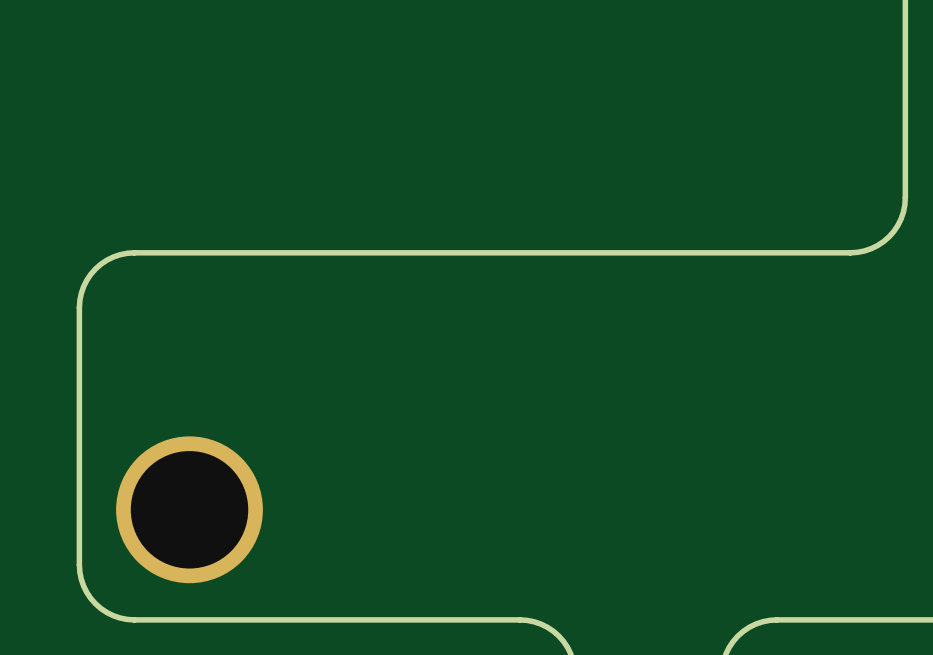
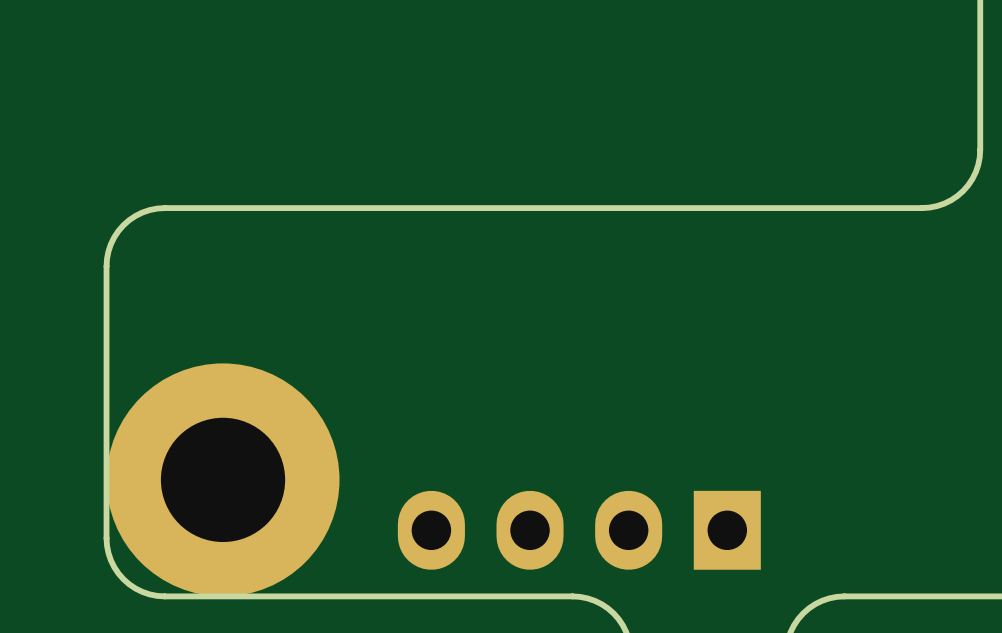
part footprint: [116, 436, 263, 584] -> [106, 363, 340, 597]
part: none -> (579, 530)

